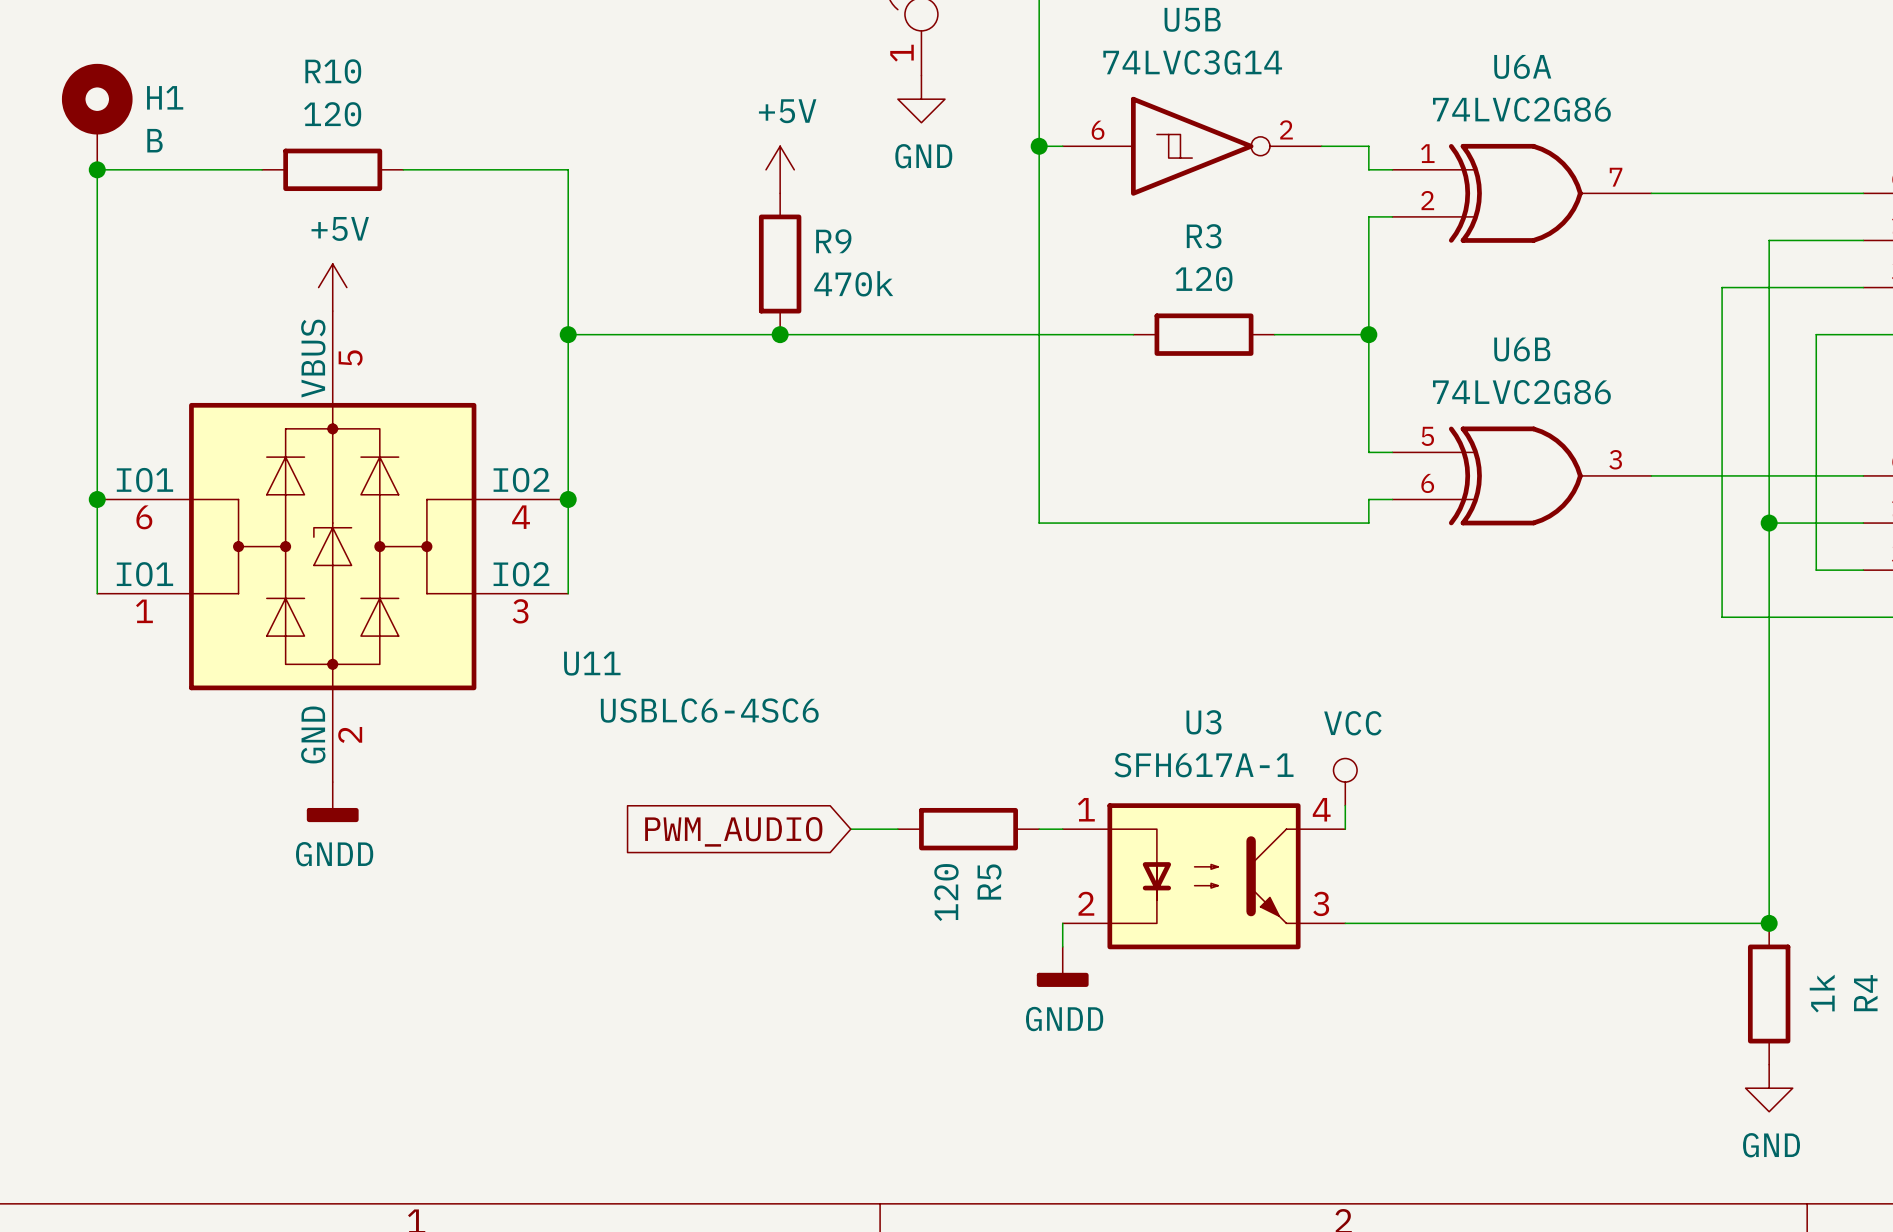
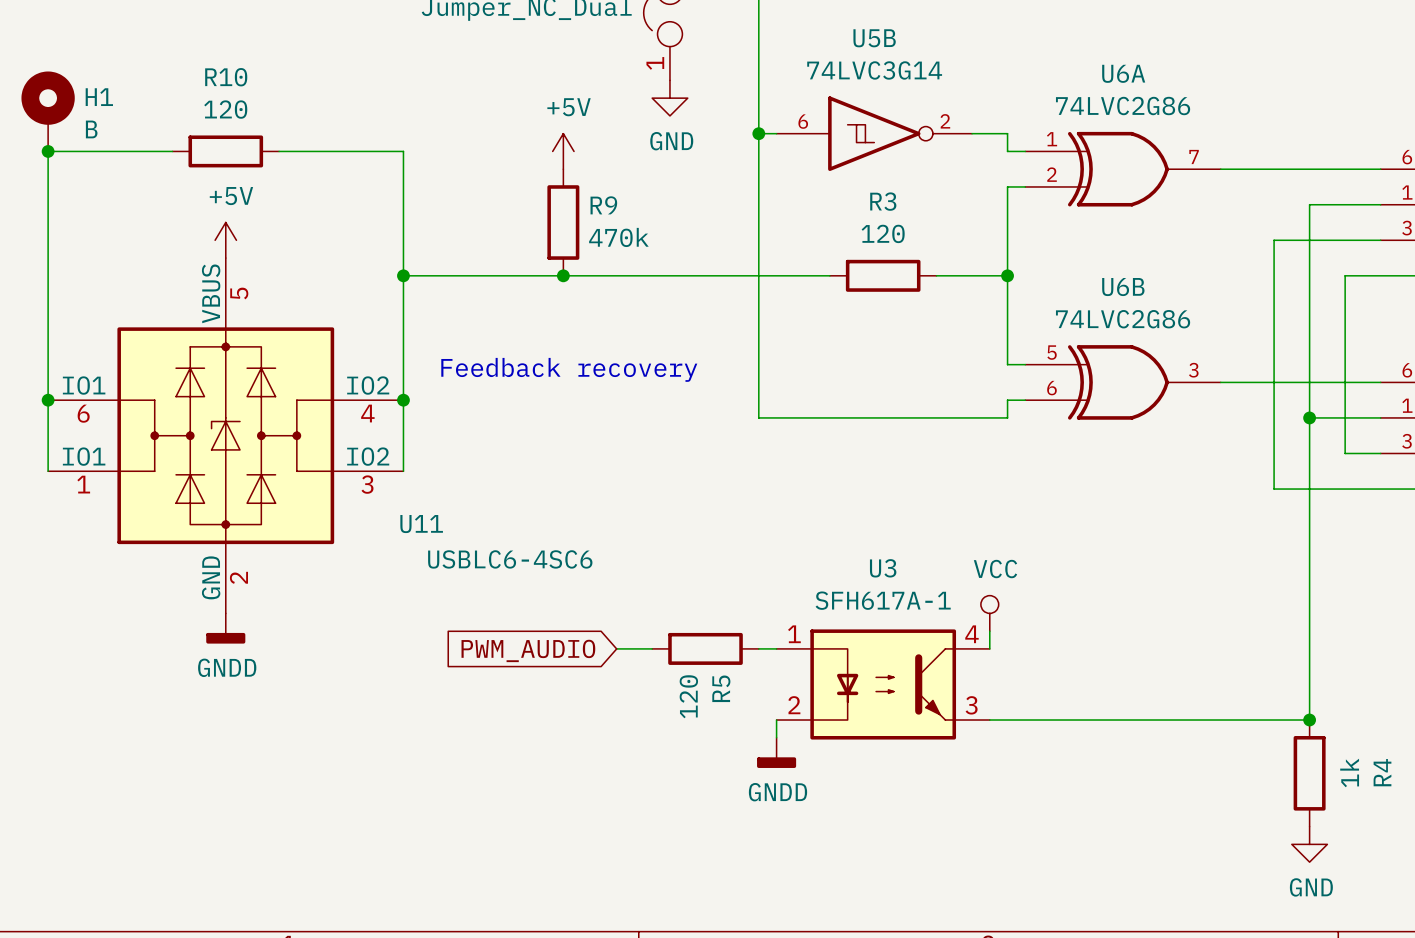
text: none -> Feedback recovery (569, 369)

